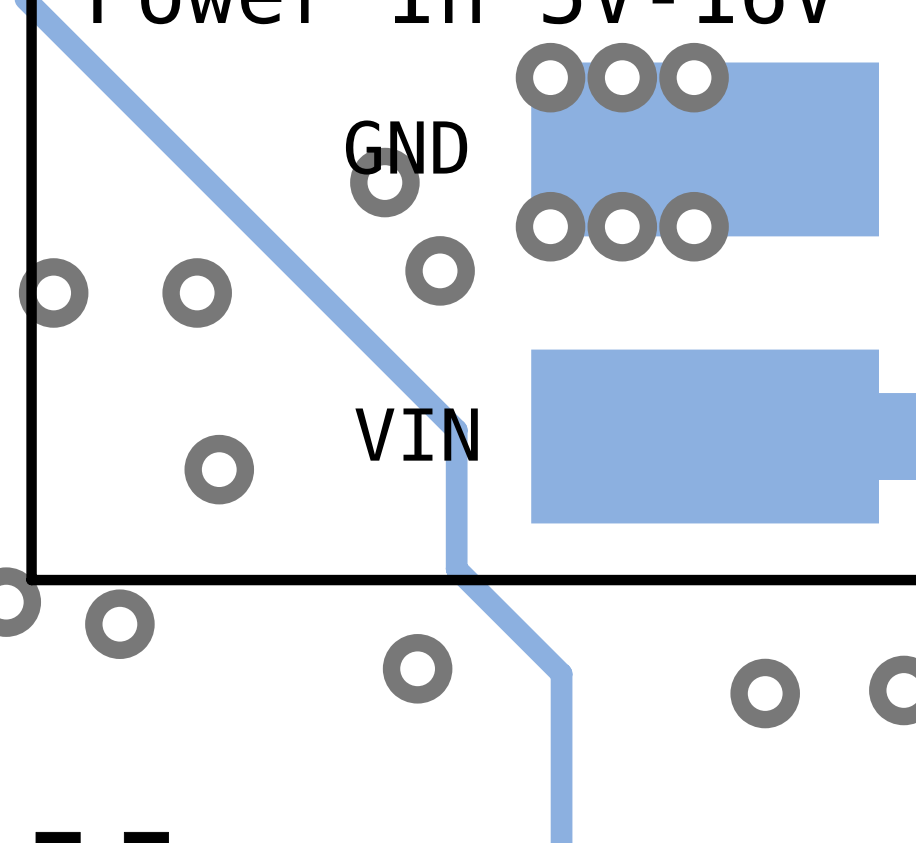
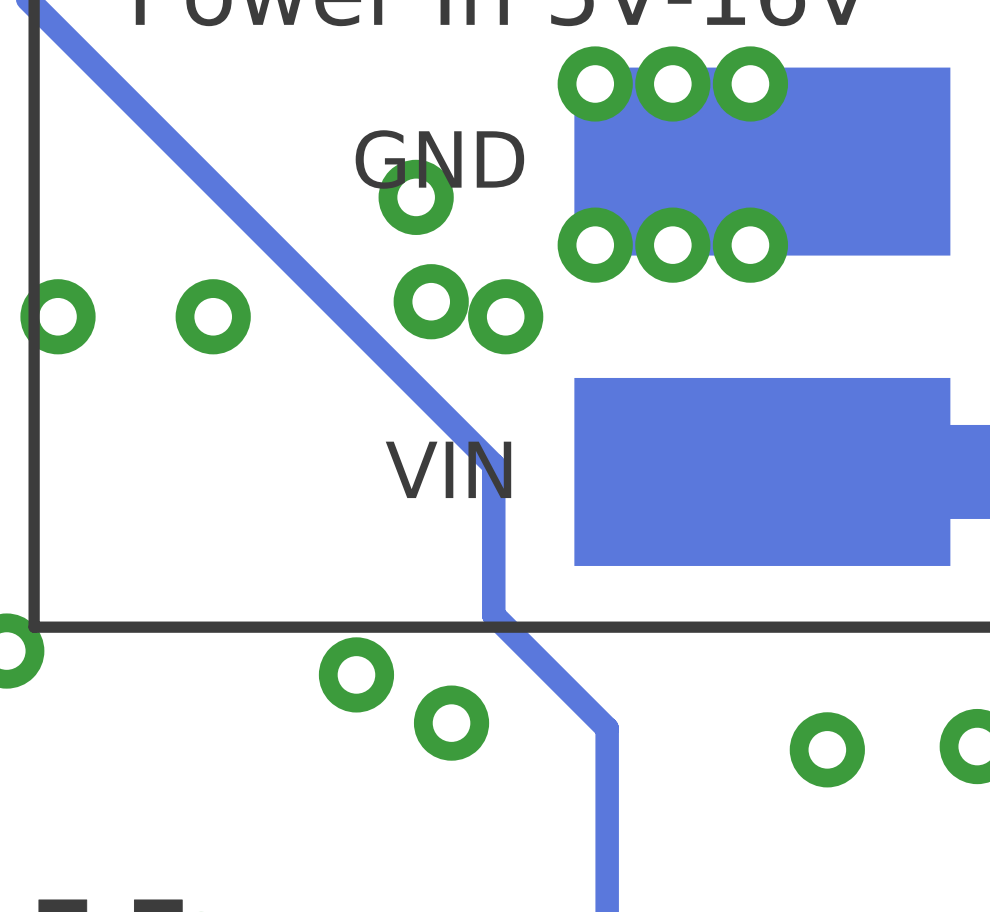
via: (440, 270) -> none
via: none -> (431, 301)
via: none -> (505, 316)
via: (219, 469) -> none
via: (119, 624) -> none
via: none -> (356, 674)

